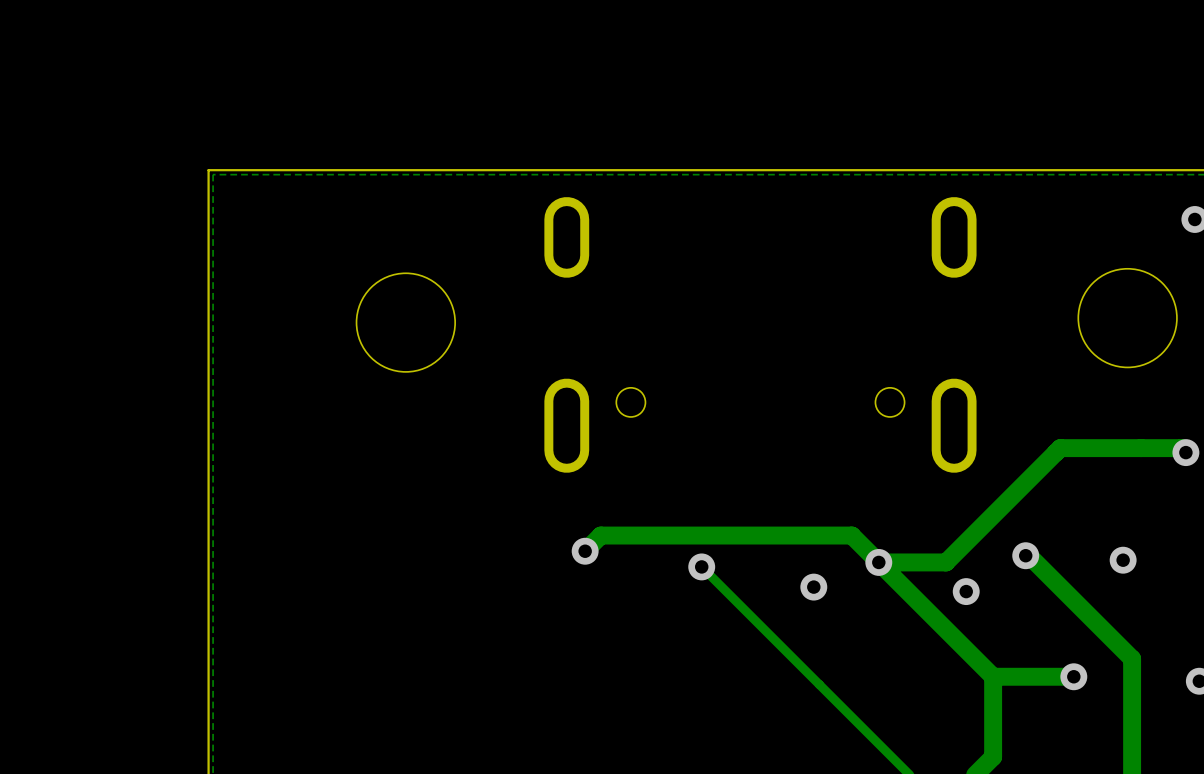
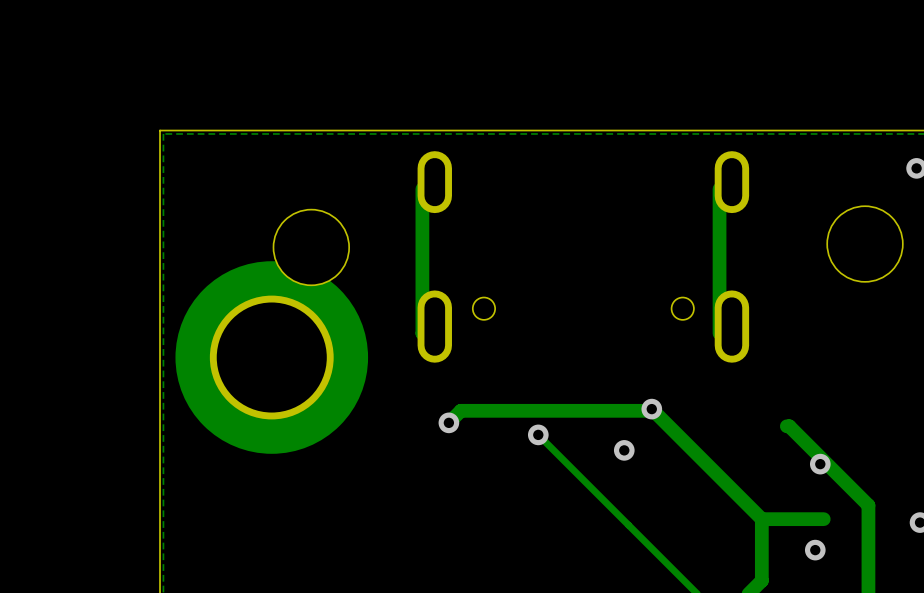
track: none -> (422, 189) (422, 333) (436, 333)
track: none -> (719, 189) (719, 333)
track: (1185, 452) (1181, 448) (1060, 448) (946, 562) (878, 562) -> none
via: (1185, 452) -> none
part: none -> (271, 357)
via: (1025, 555) -> none
via: (1123, 560) -> none
via position: (878, 562) -> (651, 409)
via: (966, 591) -> none
via: none -> (820, 464)
via: (1073, 676) -> none
via: none -> (815, 550)

